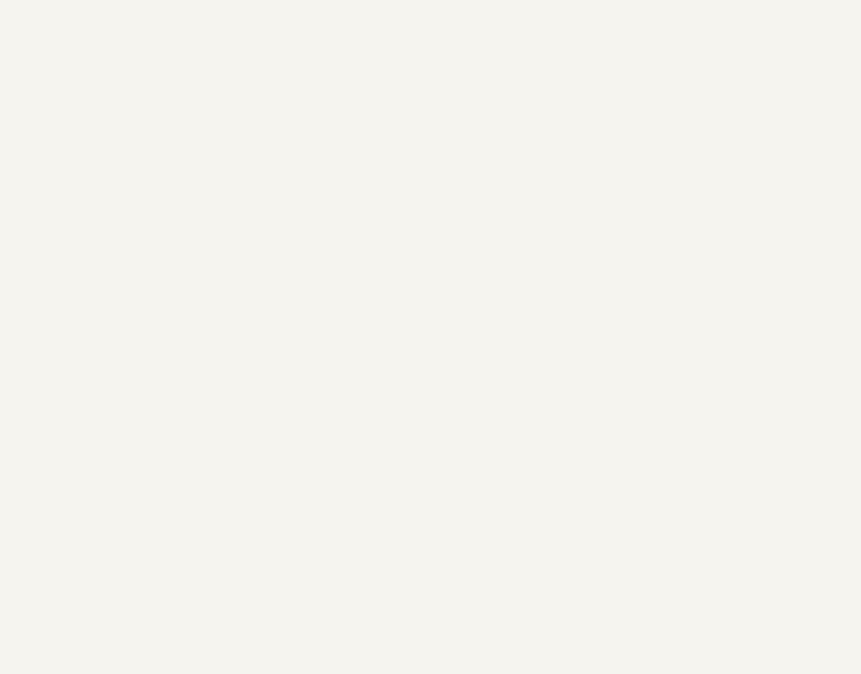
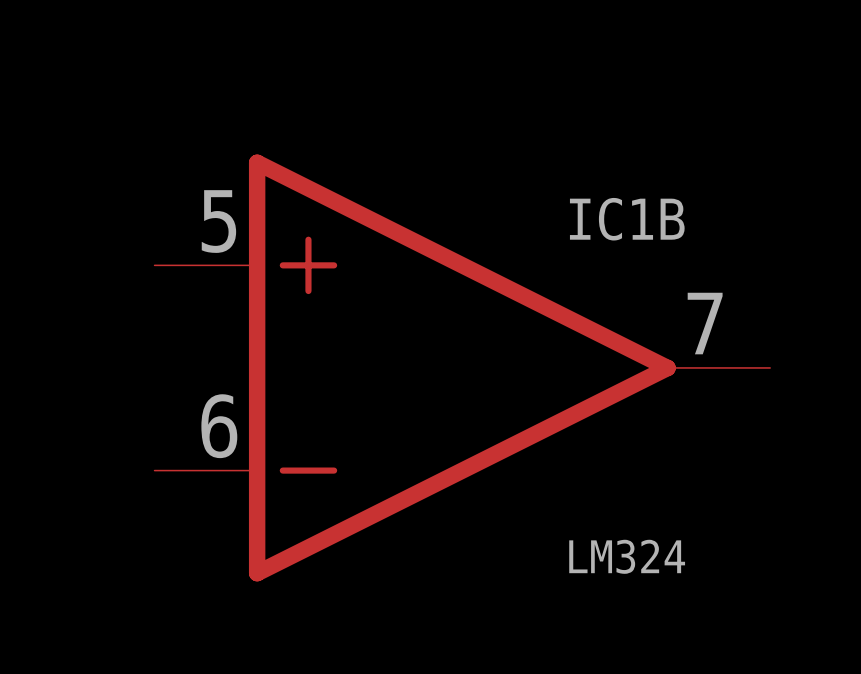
IC1B: none -> LM324 (462, 367)

